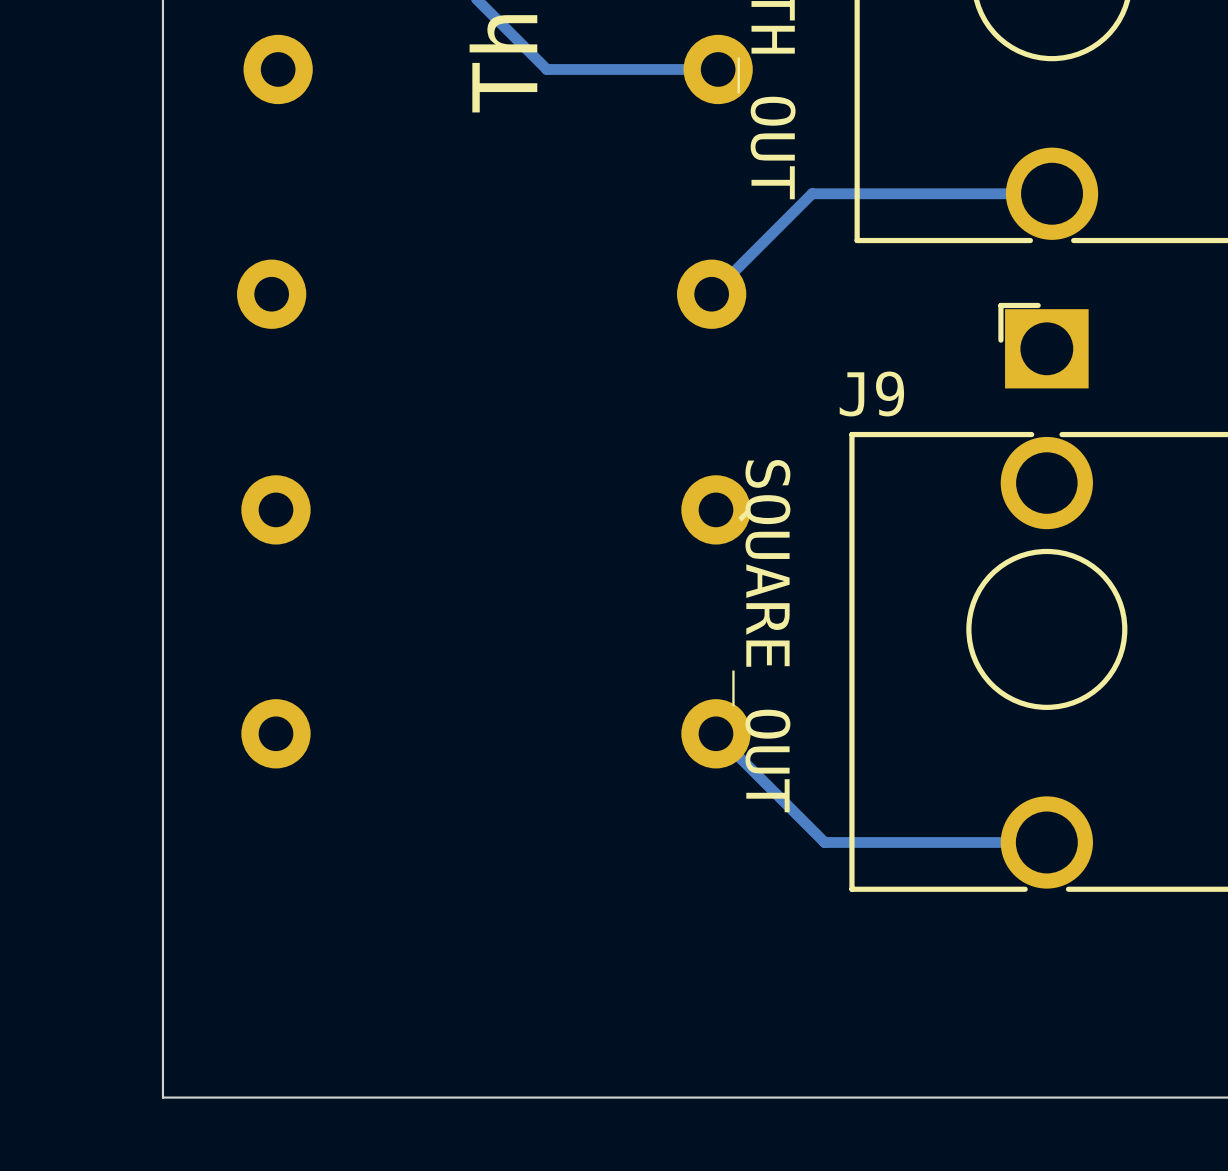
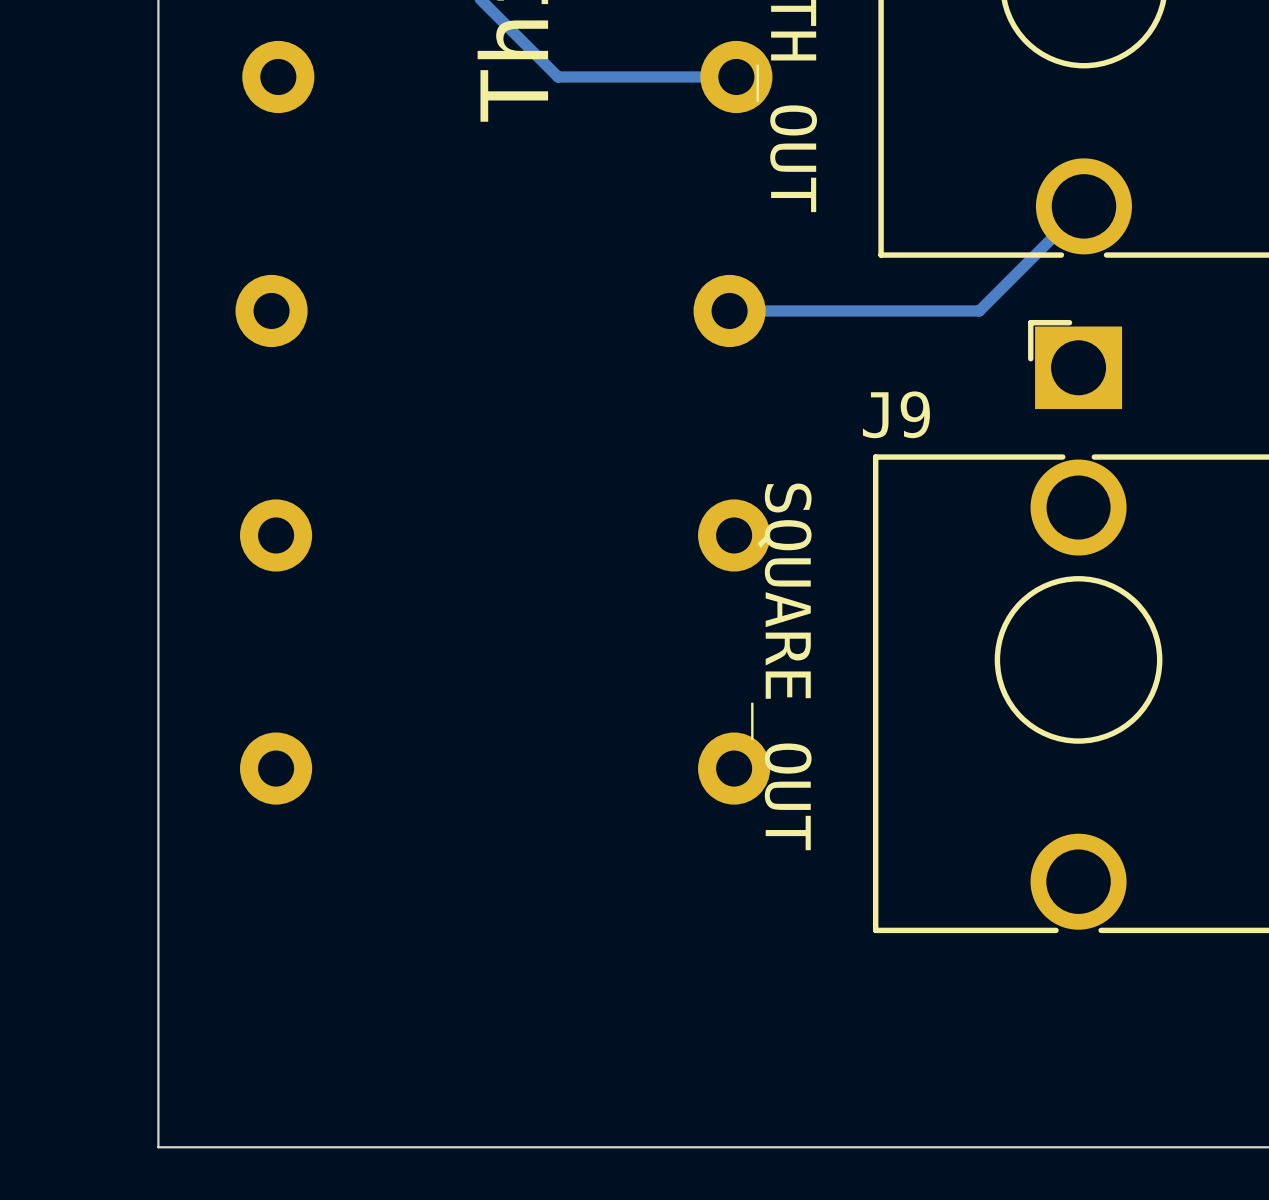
track: (1052, 193) (812, 193) (711, 294) -> (1083, 206) (979, 310) (729, 310)
track: (715, 733) (824, 842) (1046, 842) -> none

